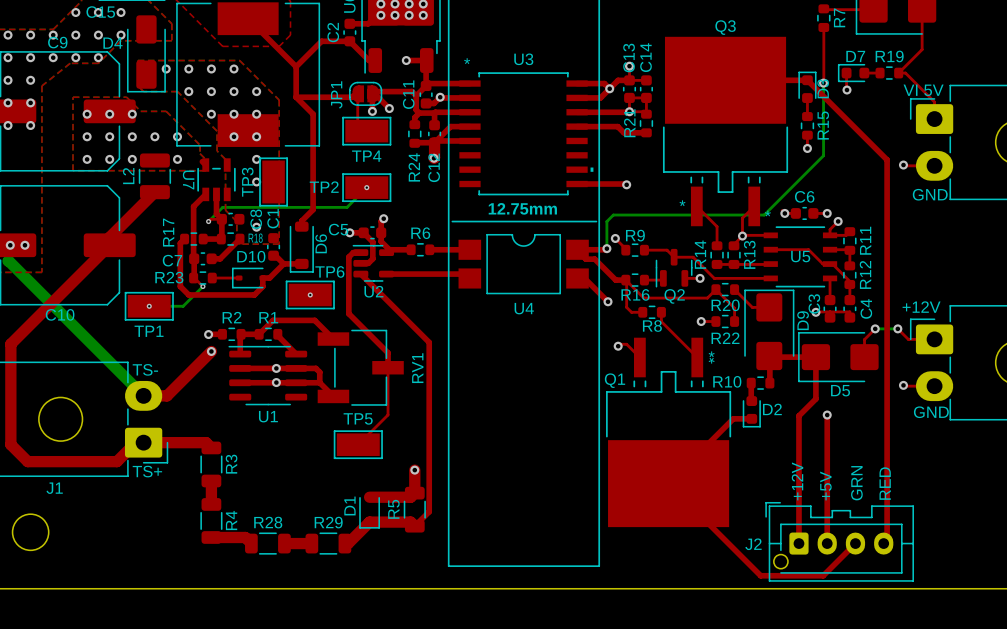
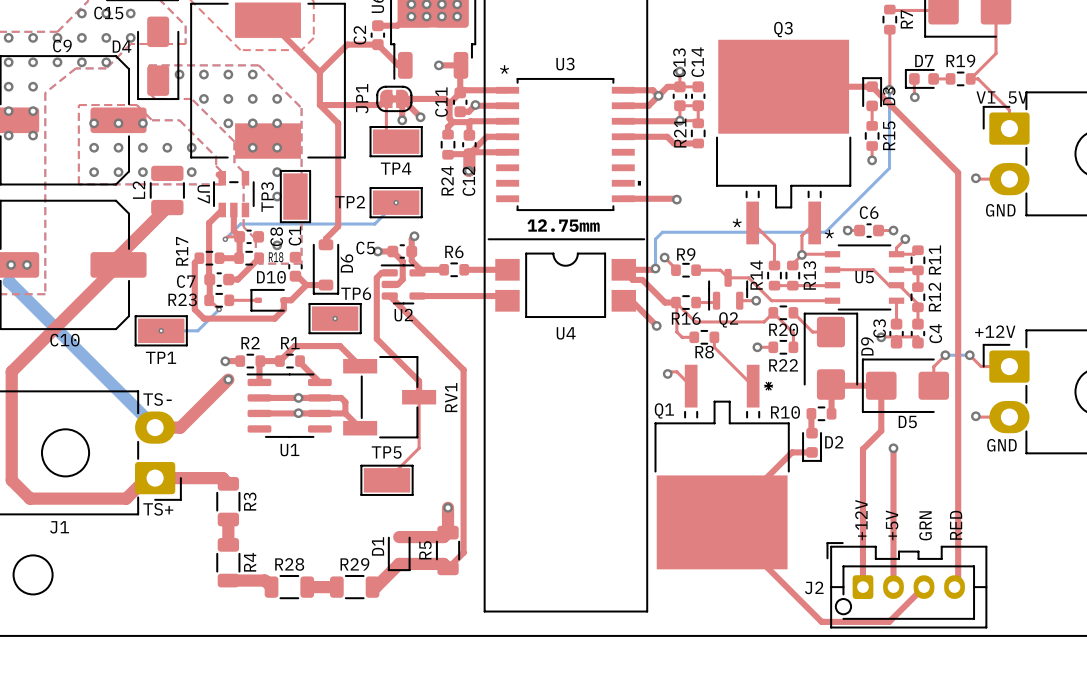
JP1 footprint: [349, 81, 383, 106] -> [376, 85, 413, 112]

